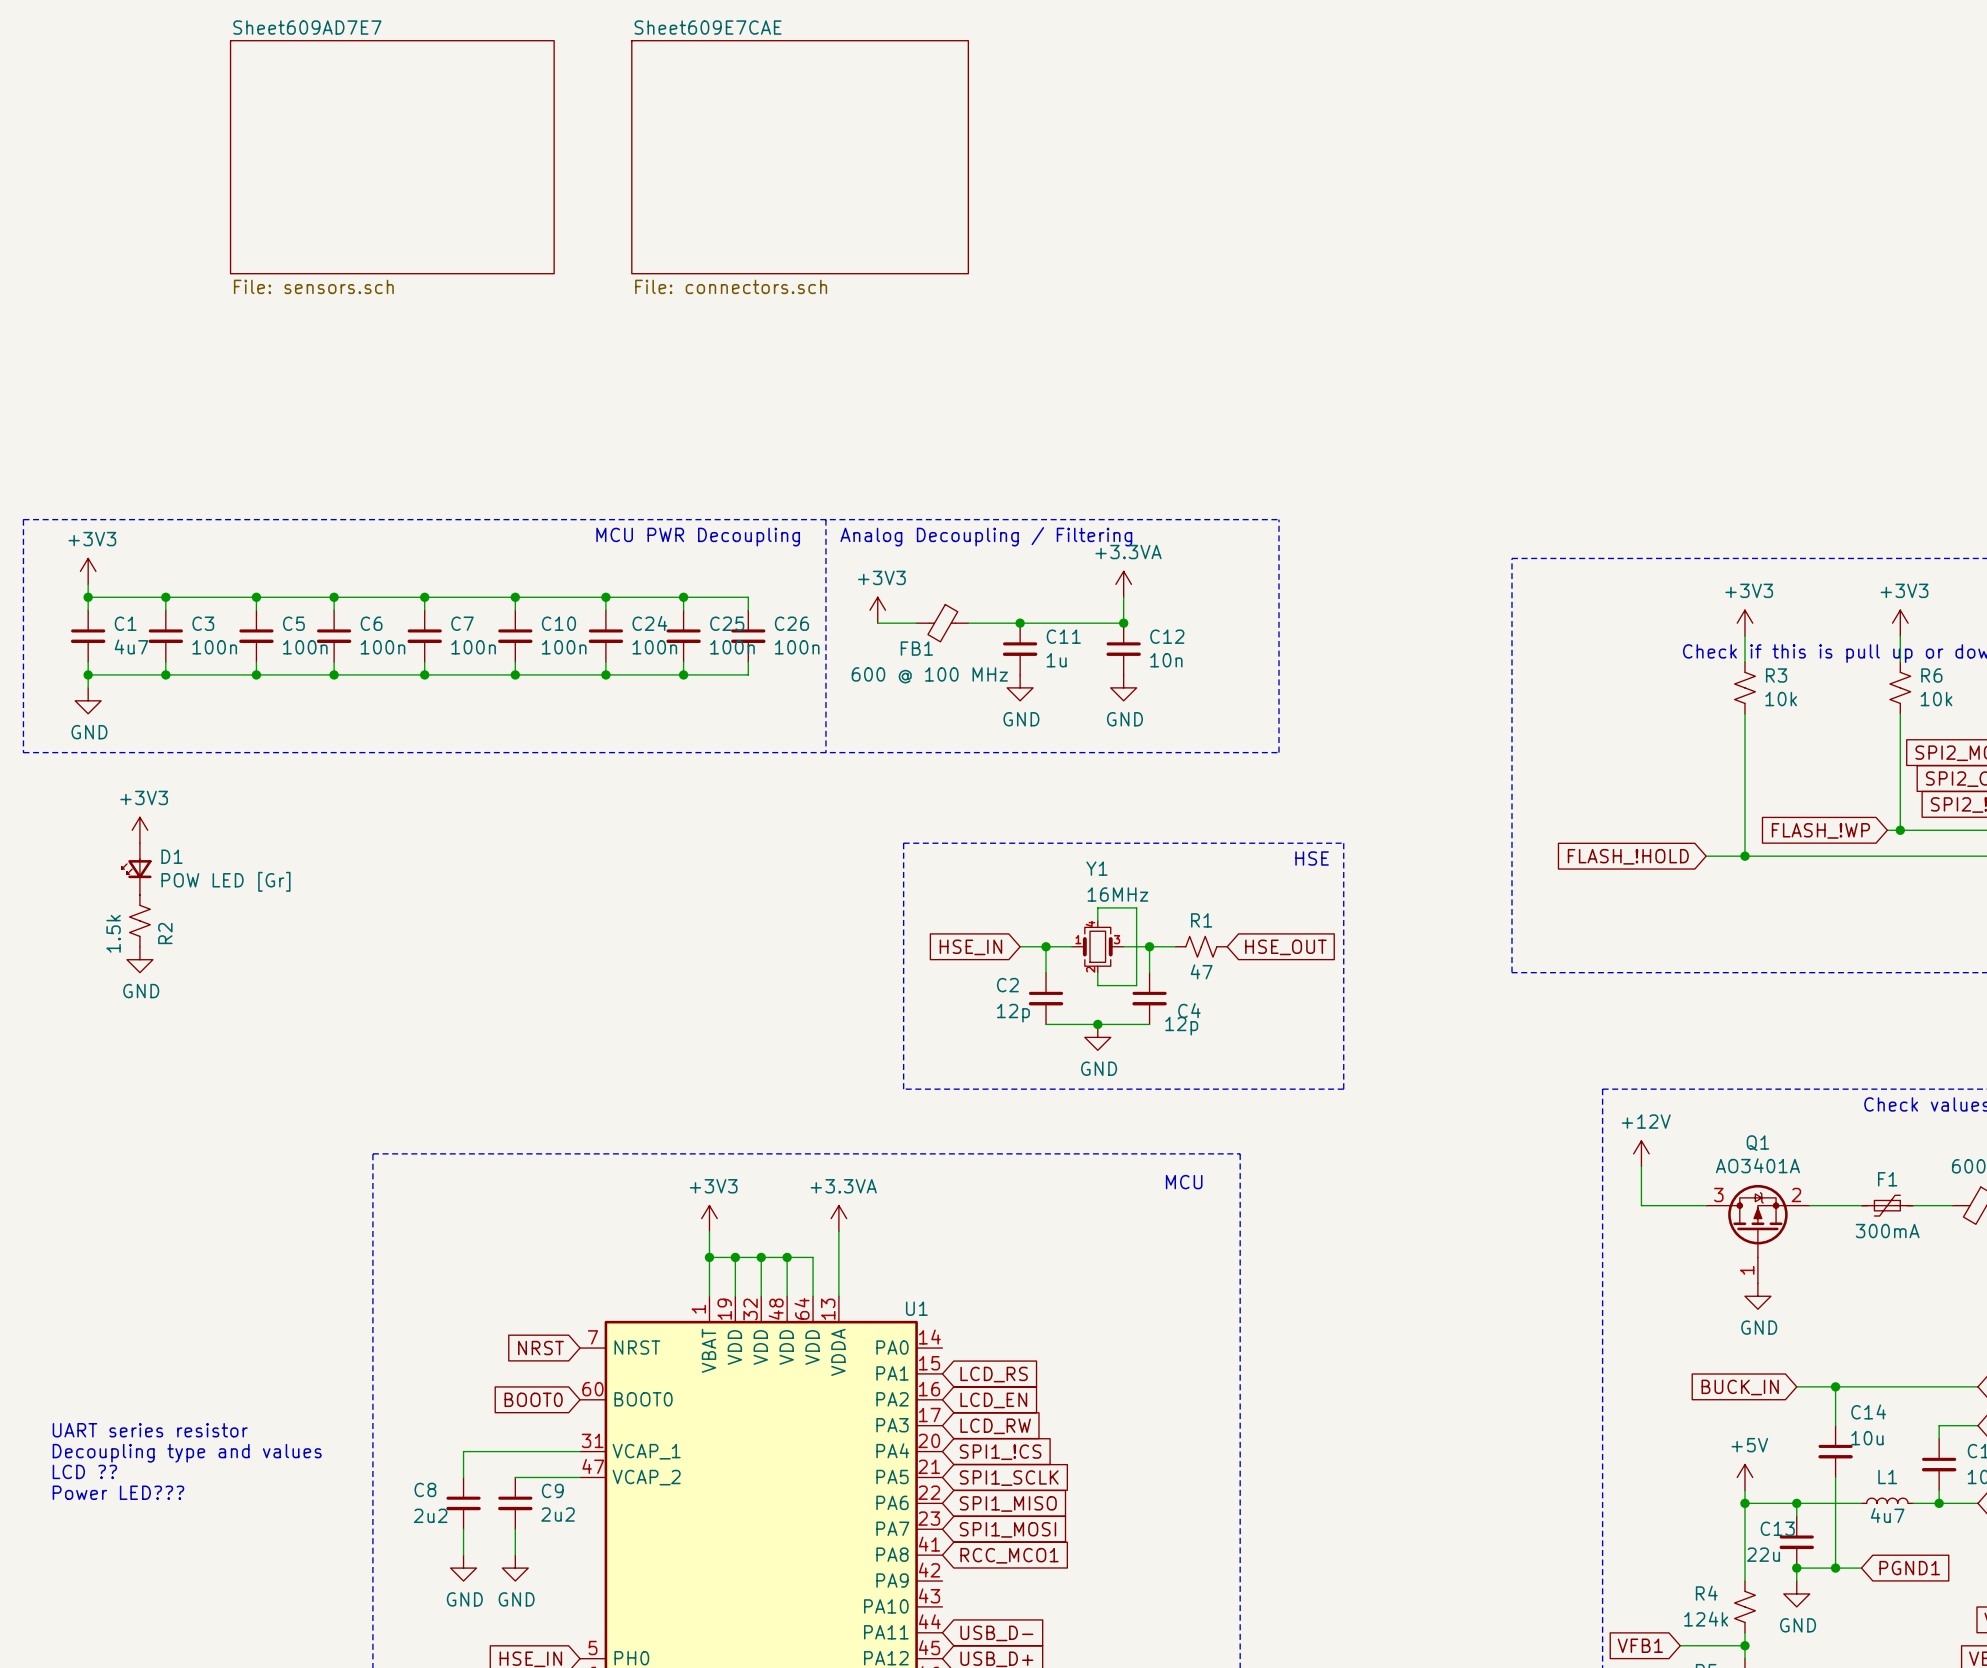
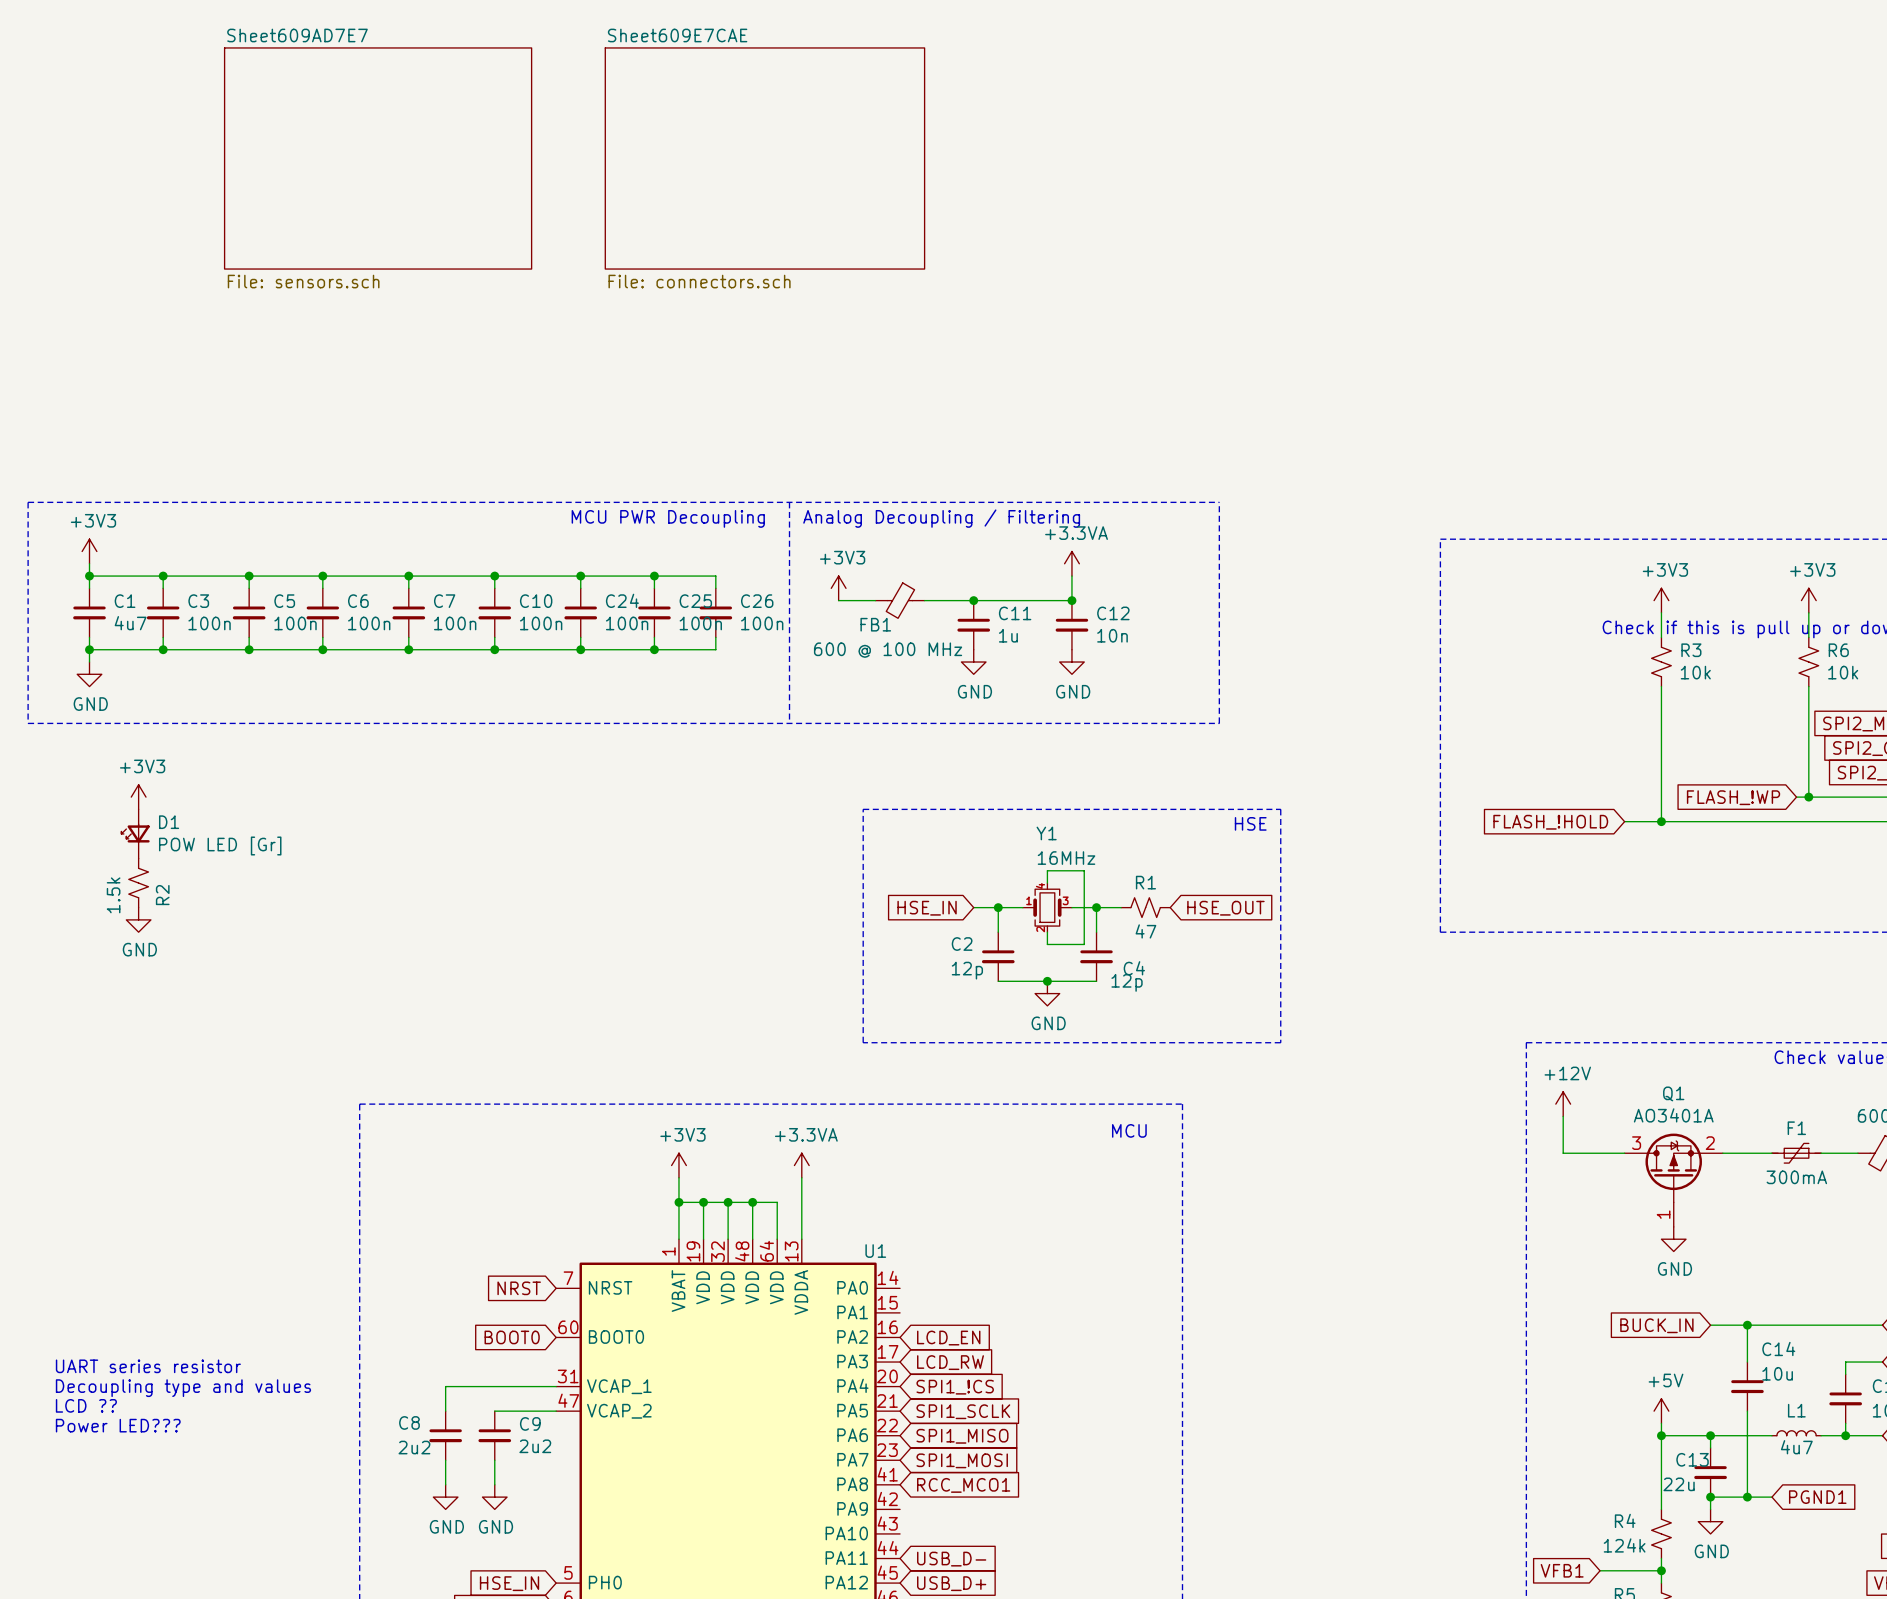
global label: LCD_RS (994, 1374) -> none

